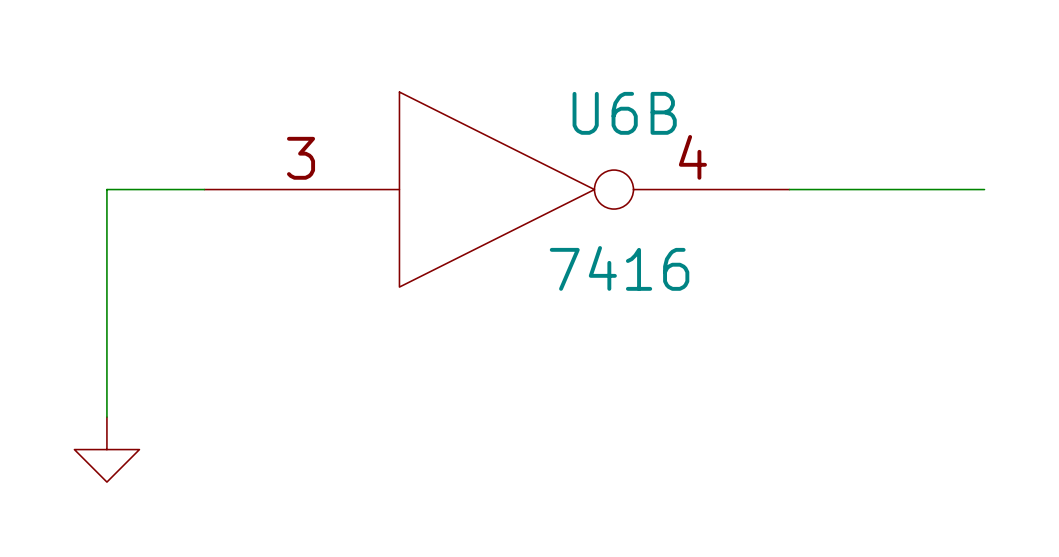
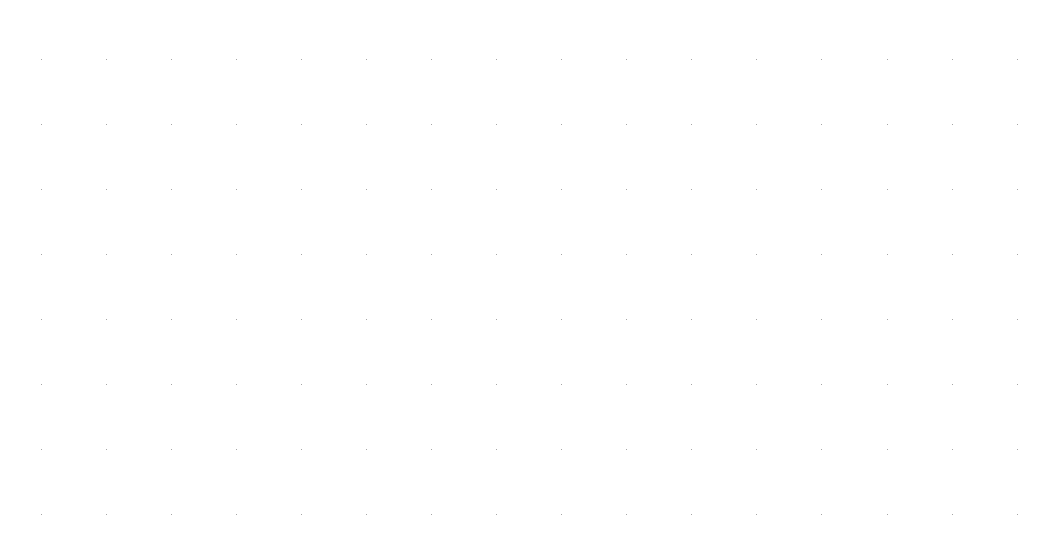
wire: (204, 189) (106, 189) (106, 417) -> none
U6B: 7416 (496, 189) -> none
wire: (789, 189) (984, 189) -> none
power symbol: (106, 449) -> none

